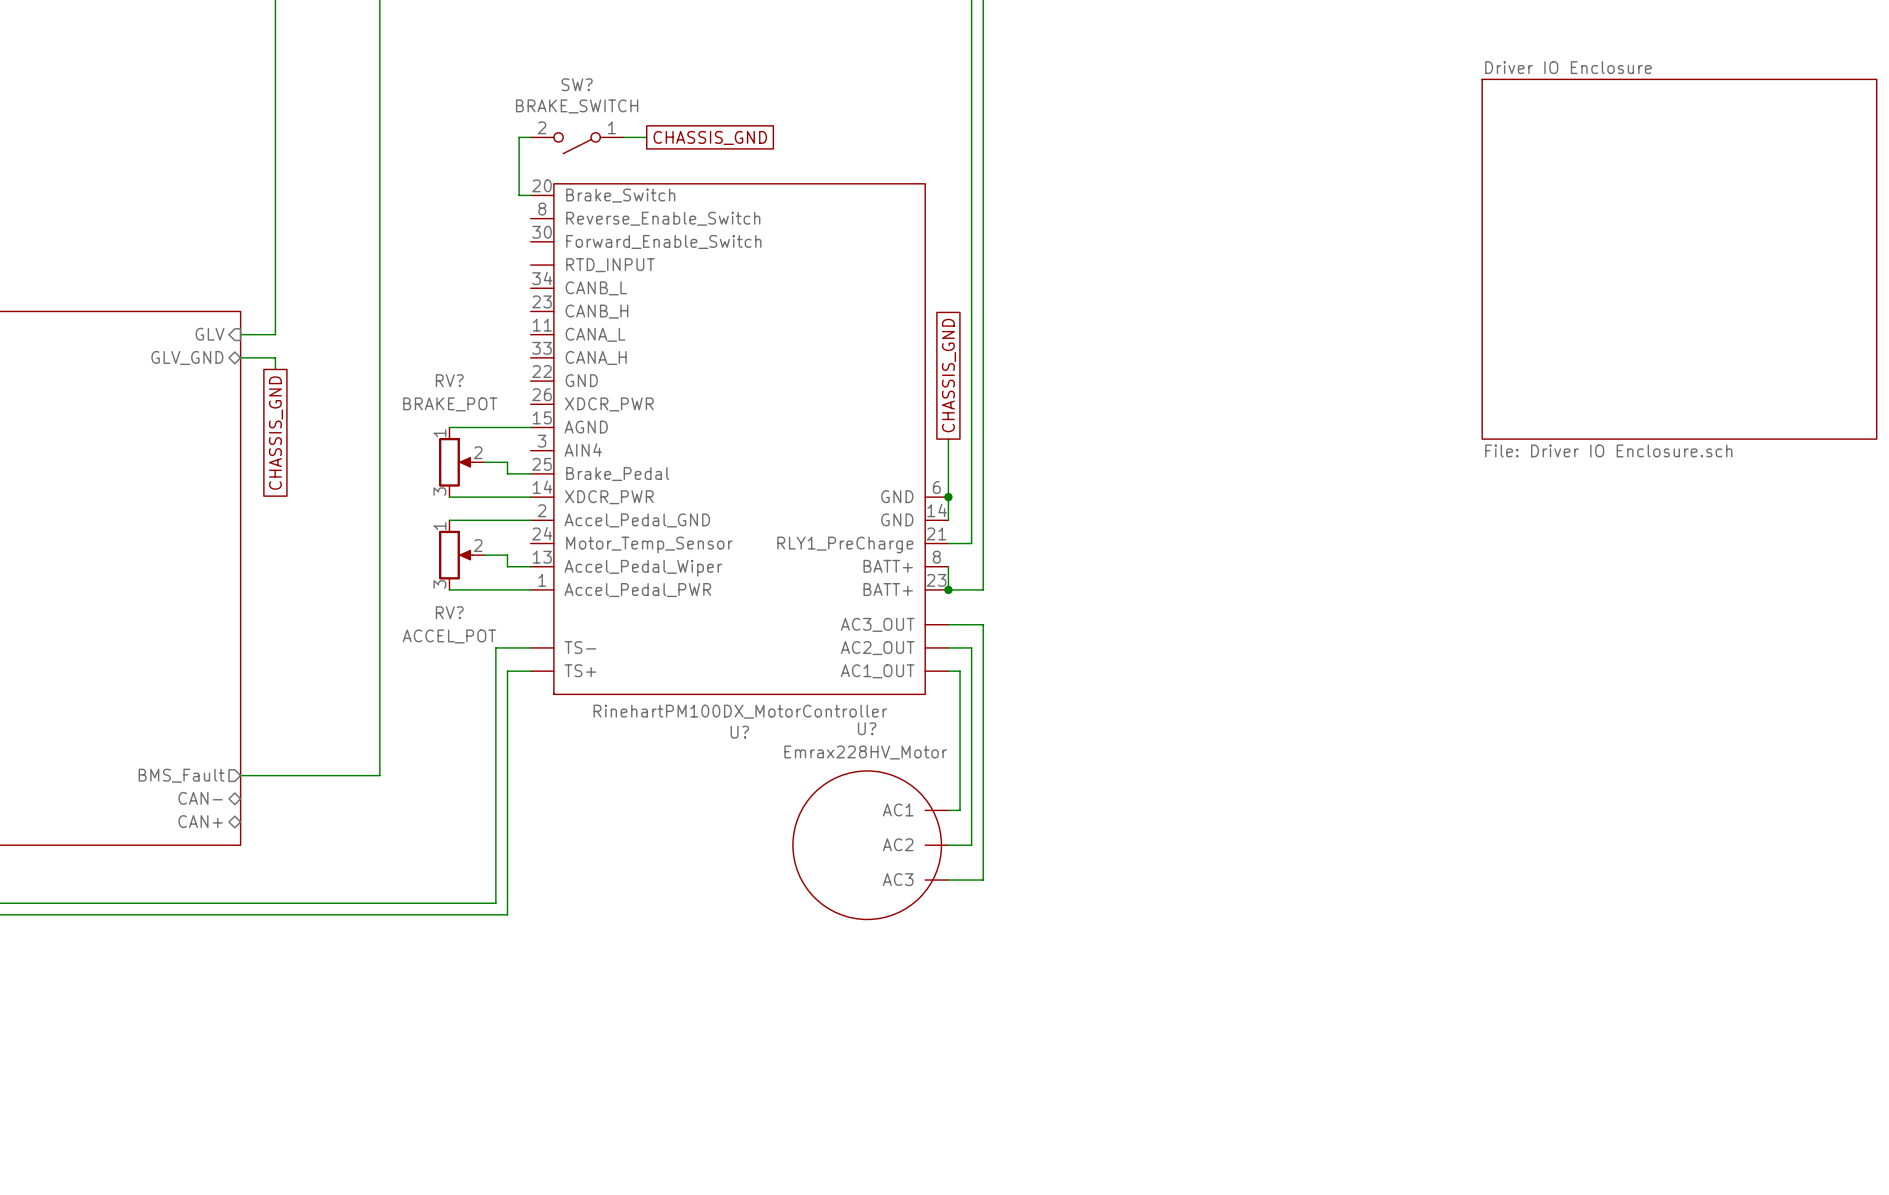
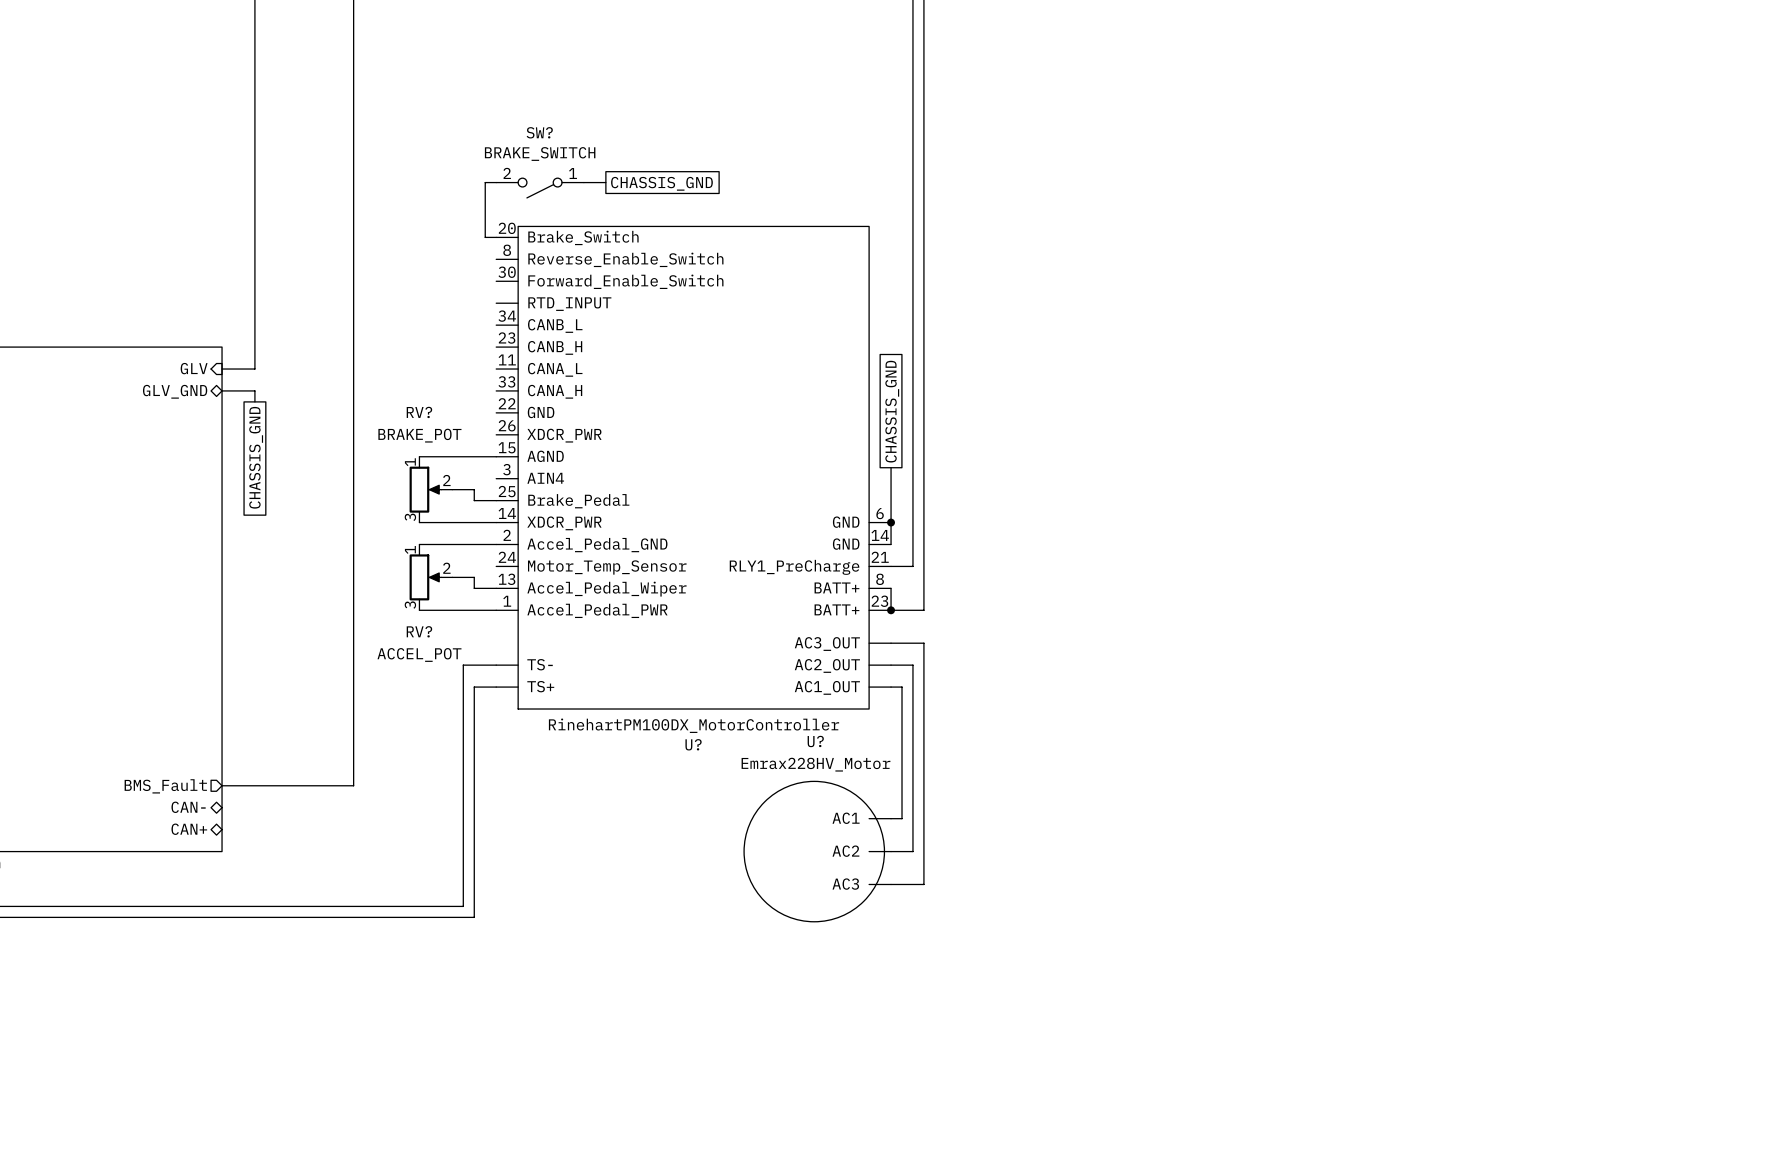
sheet Driver IO Enclosure: File: Driver IO Enclosure.sch (1679, 259) -> none

